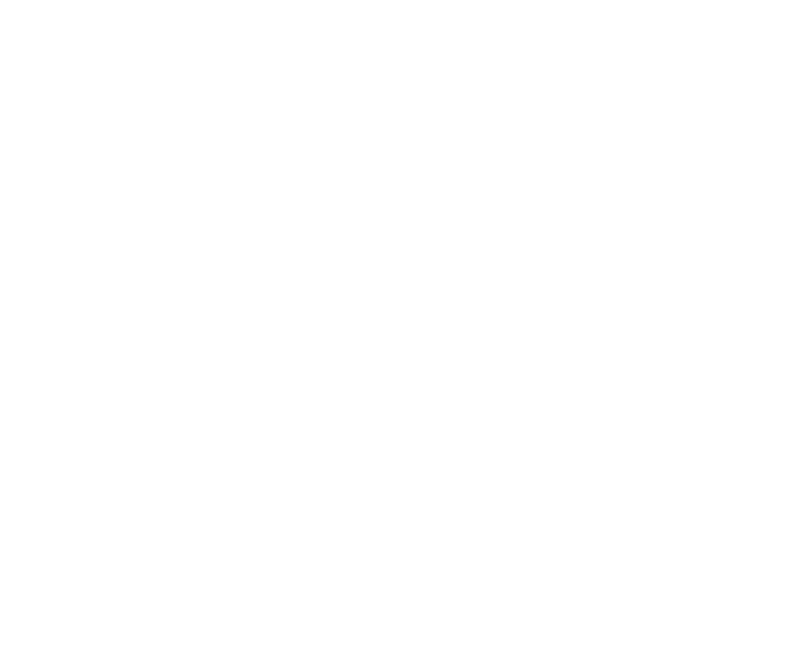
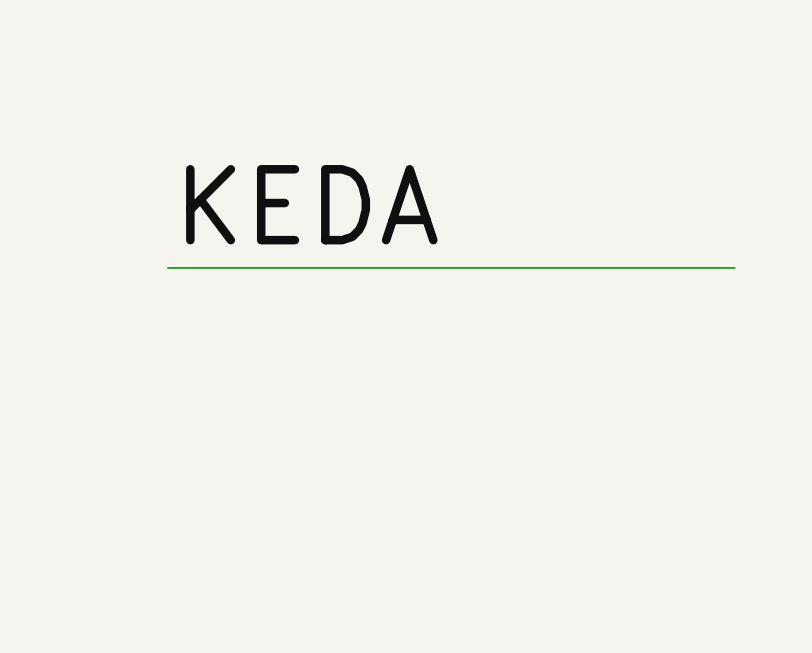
label: none -> KEDA (311, 204)
wire: none -> (167, 267) (734, 267)

